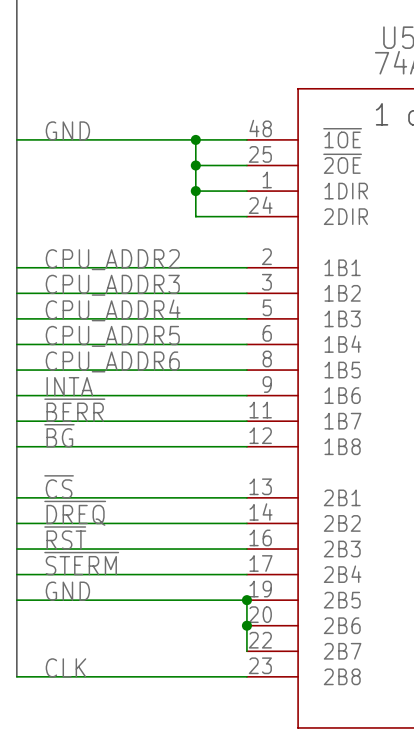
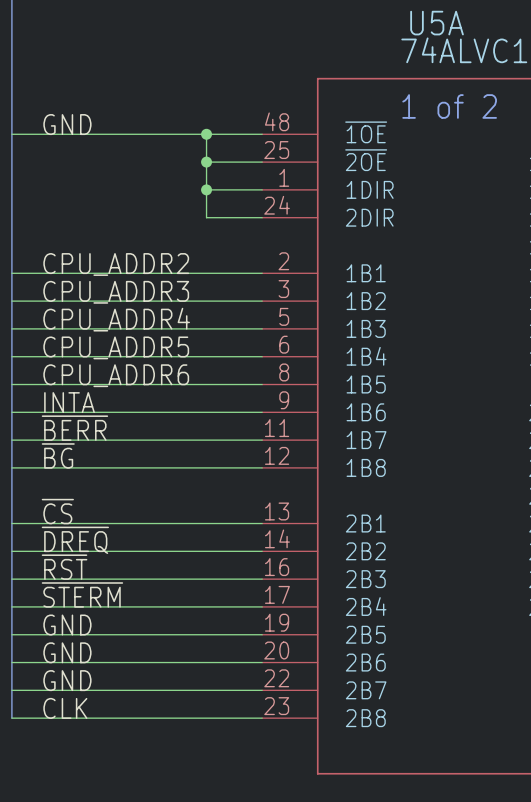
wire: (246, 600) (246, 651) -> (11, 690) (262, 690)
junction: (246, 600) -> none
label: none -> GND (67, 652)
wire: none -> (11, 662) (262, 662)
junction: (246, 625) -> none
label: none -> GND (67, 680)

